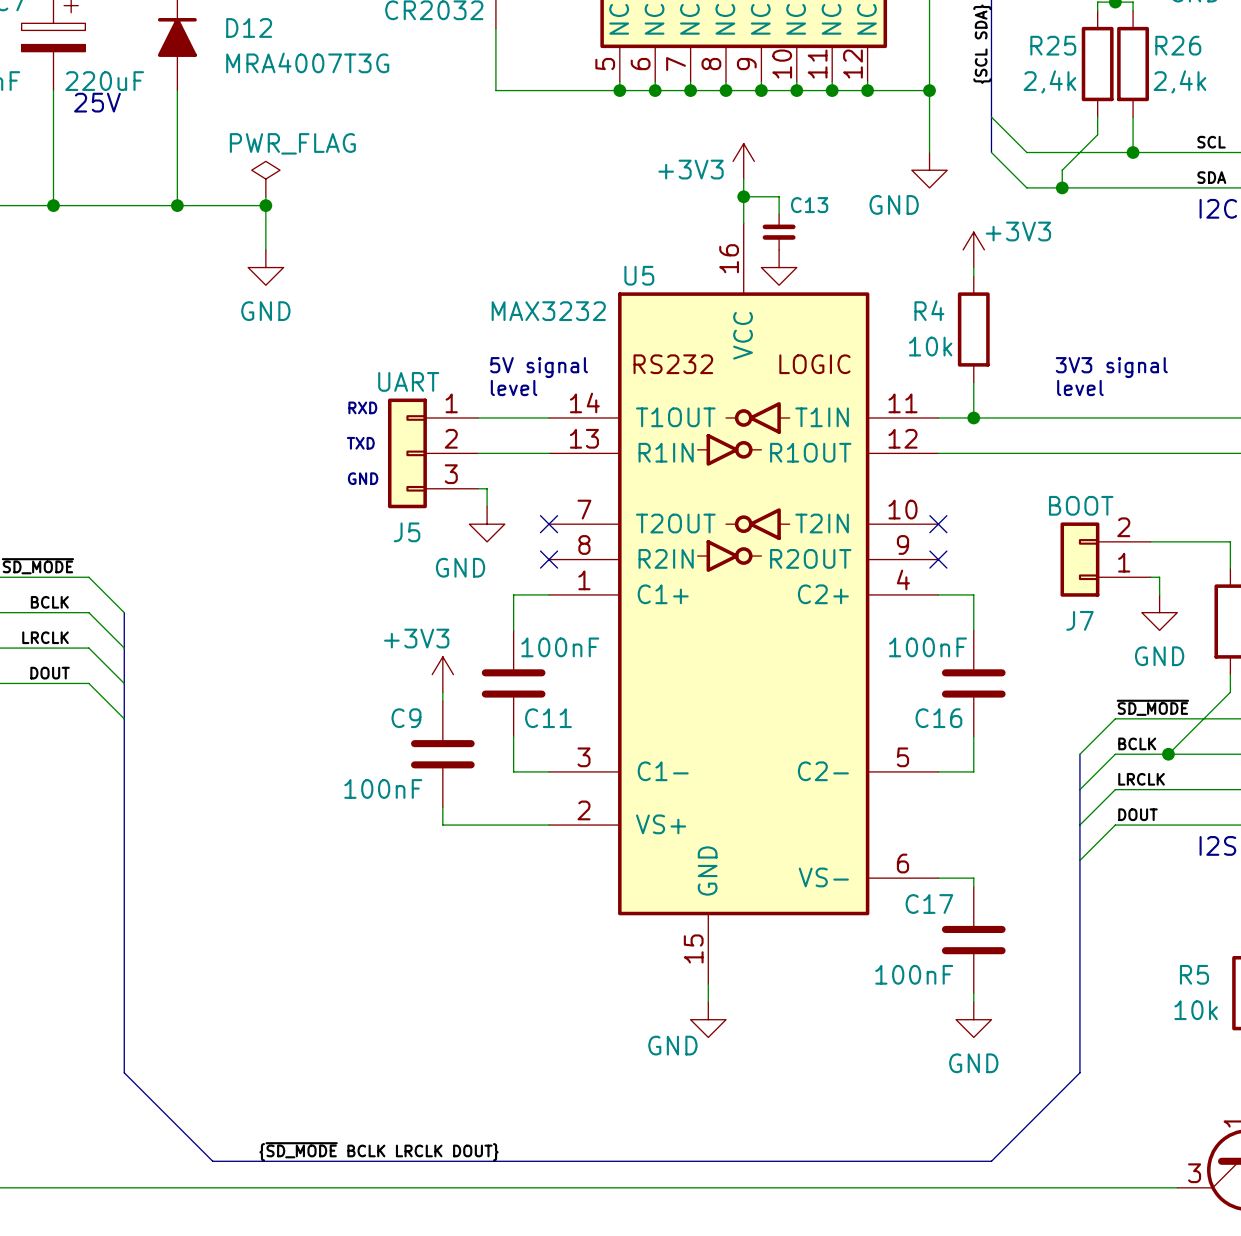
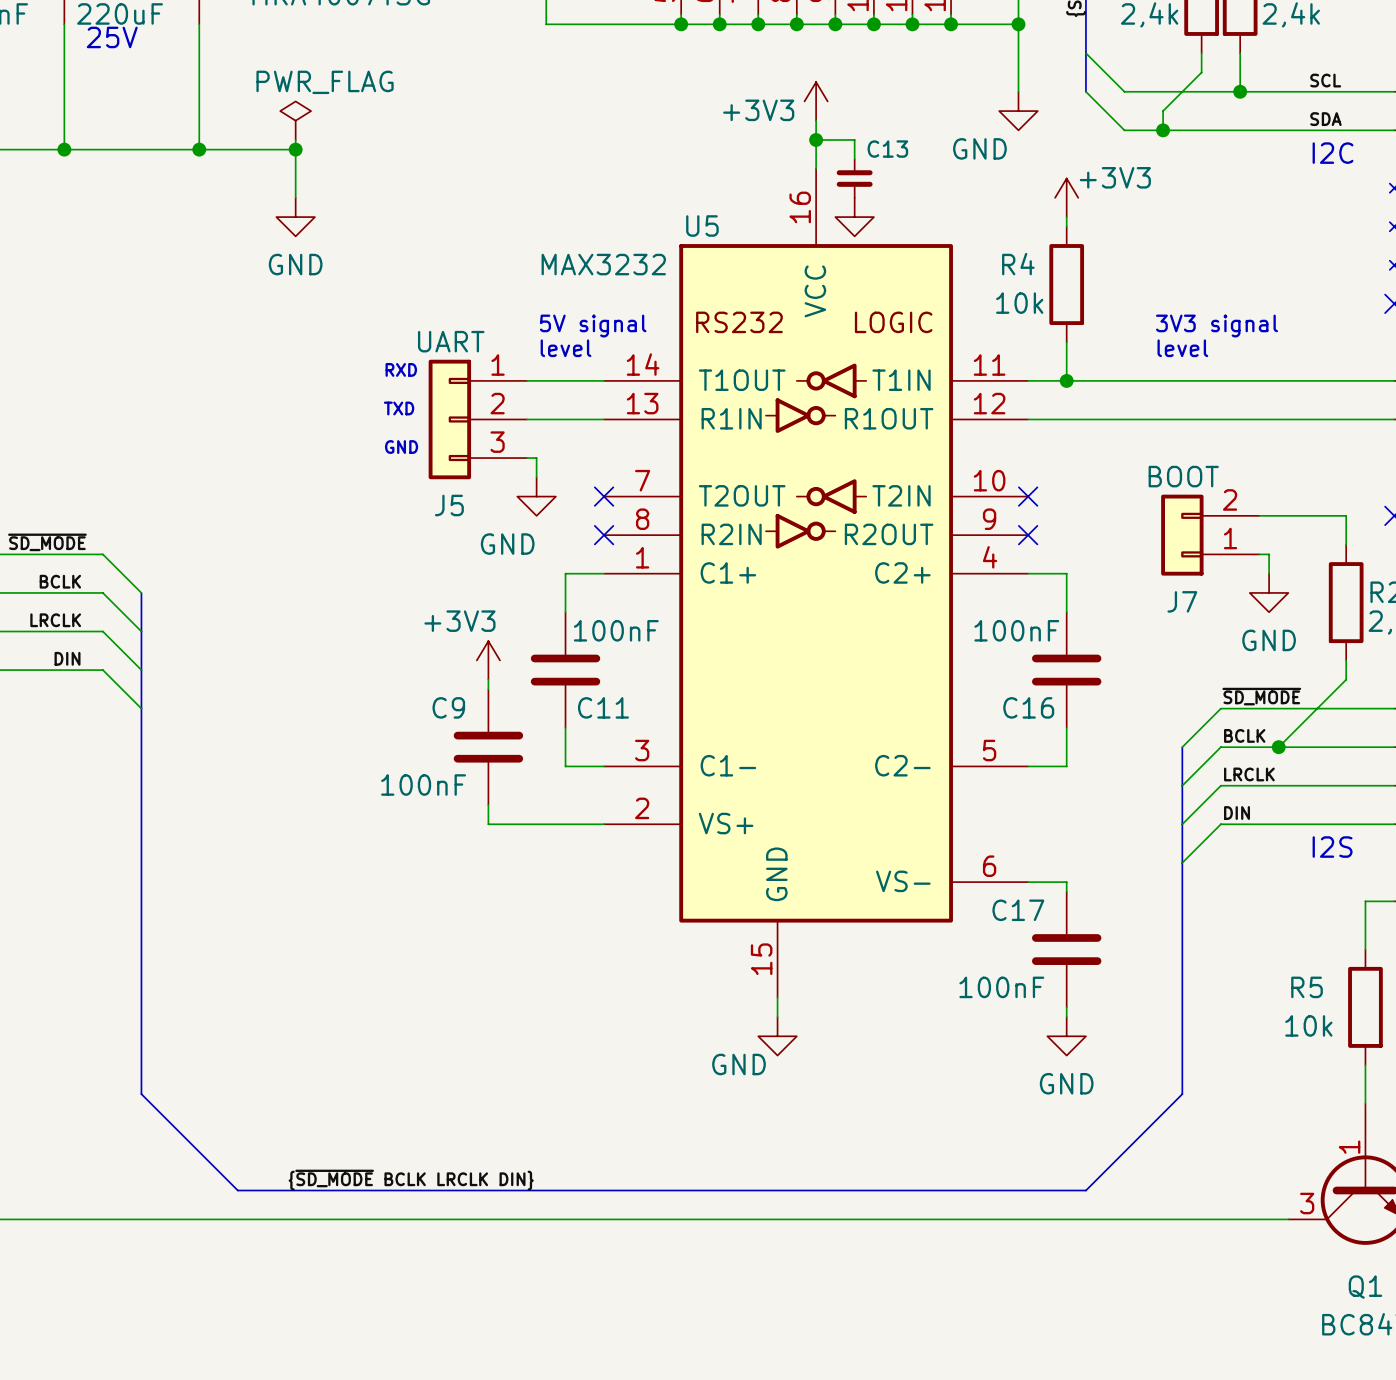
label: DOUT (50, 673) -> DIN (67, 658)
label: DOUT (1137, 814) -> DIN (1237, 813)
label: {~{SD_MODE} BCLK LRCLK DOUT} (379, 1151) -> {~{SD_MODE} BCLK LRCLK DIN} (411, 1180)

